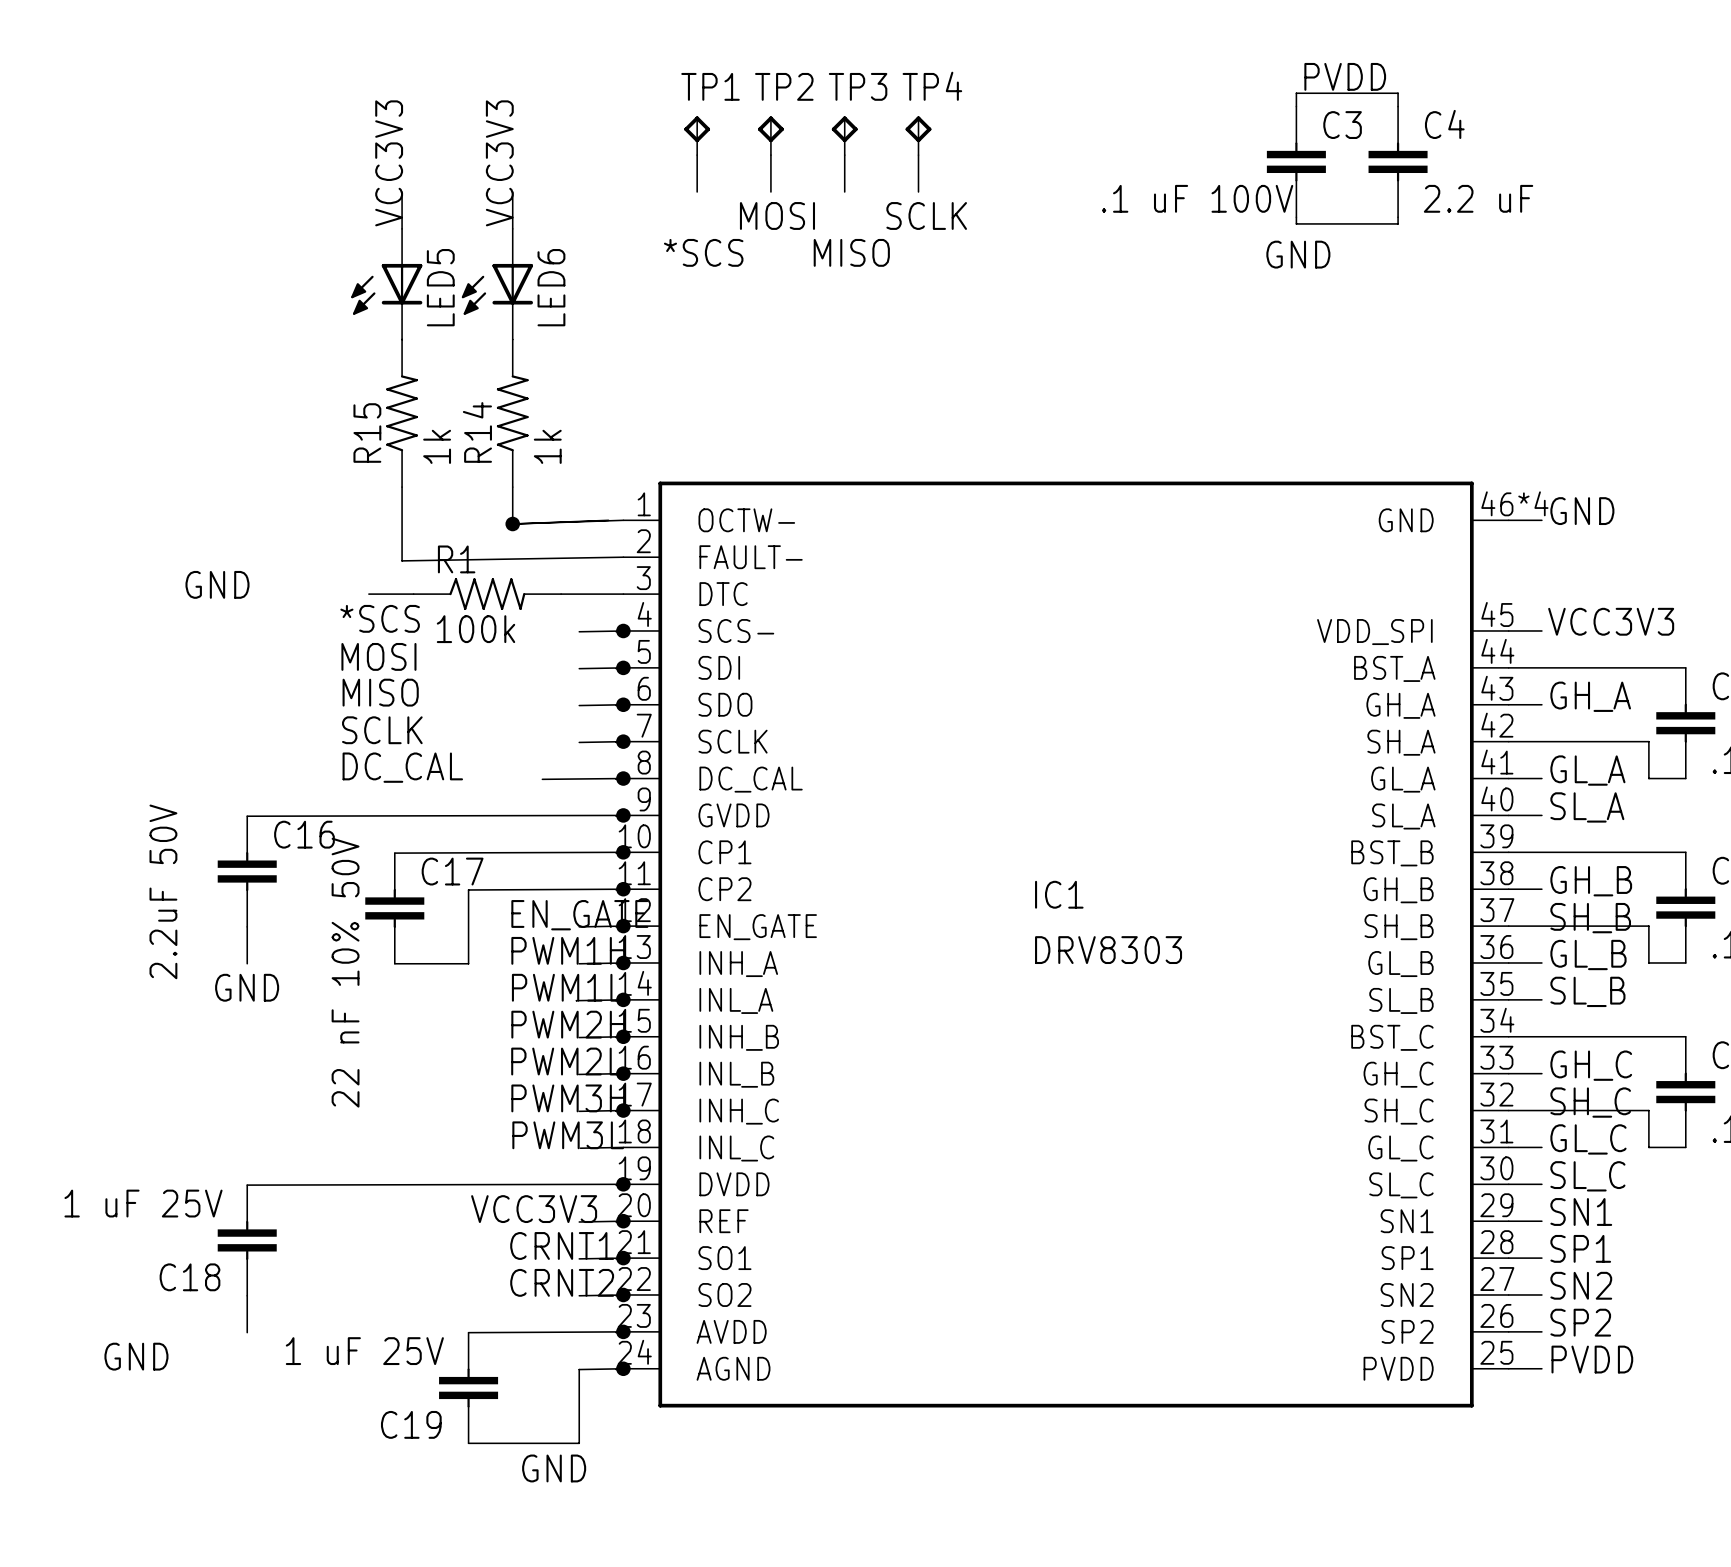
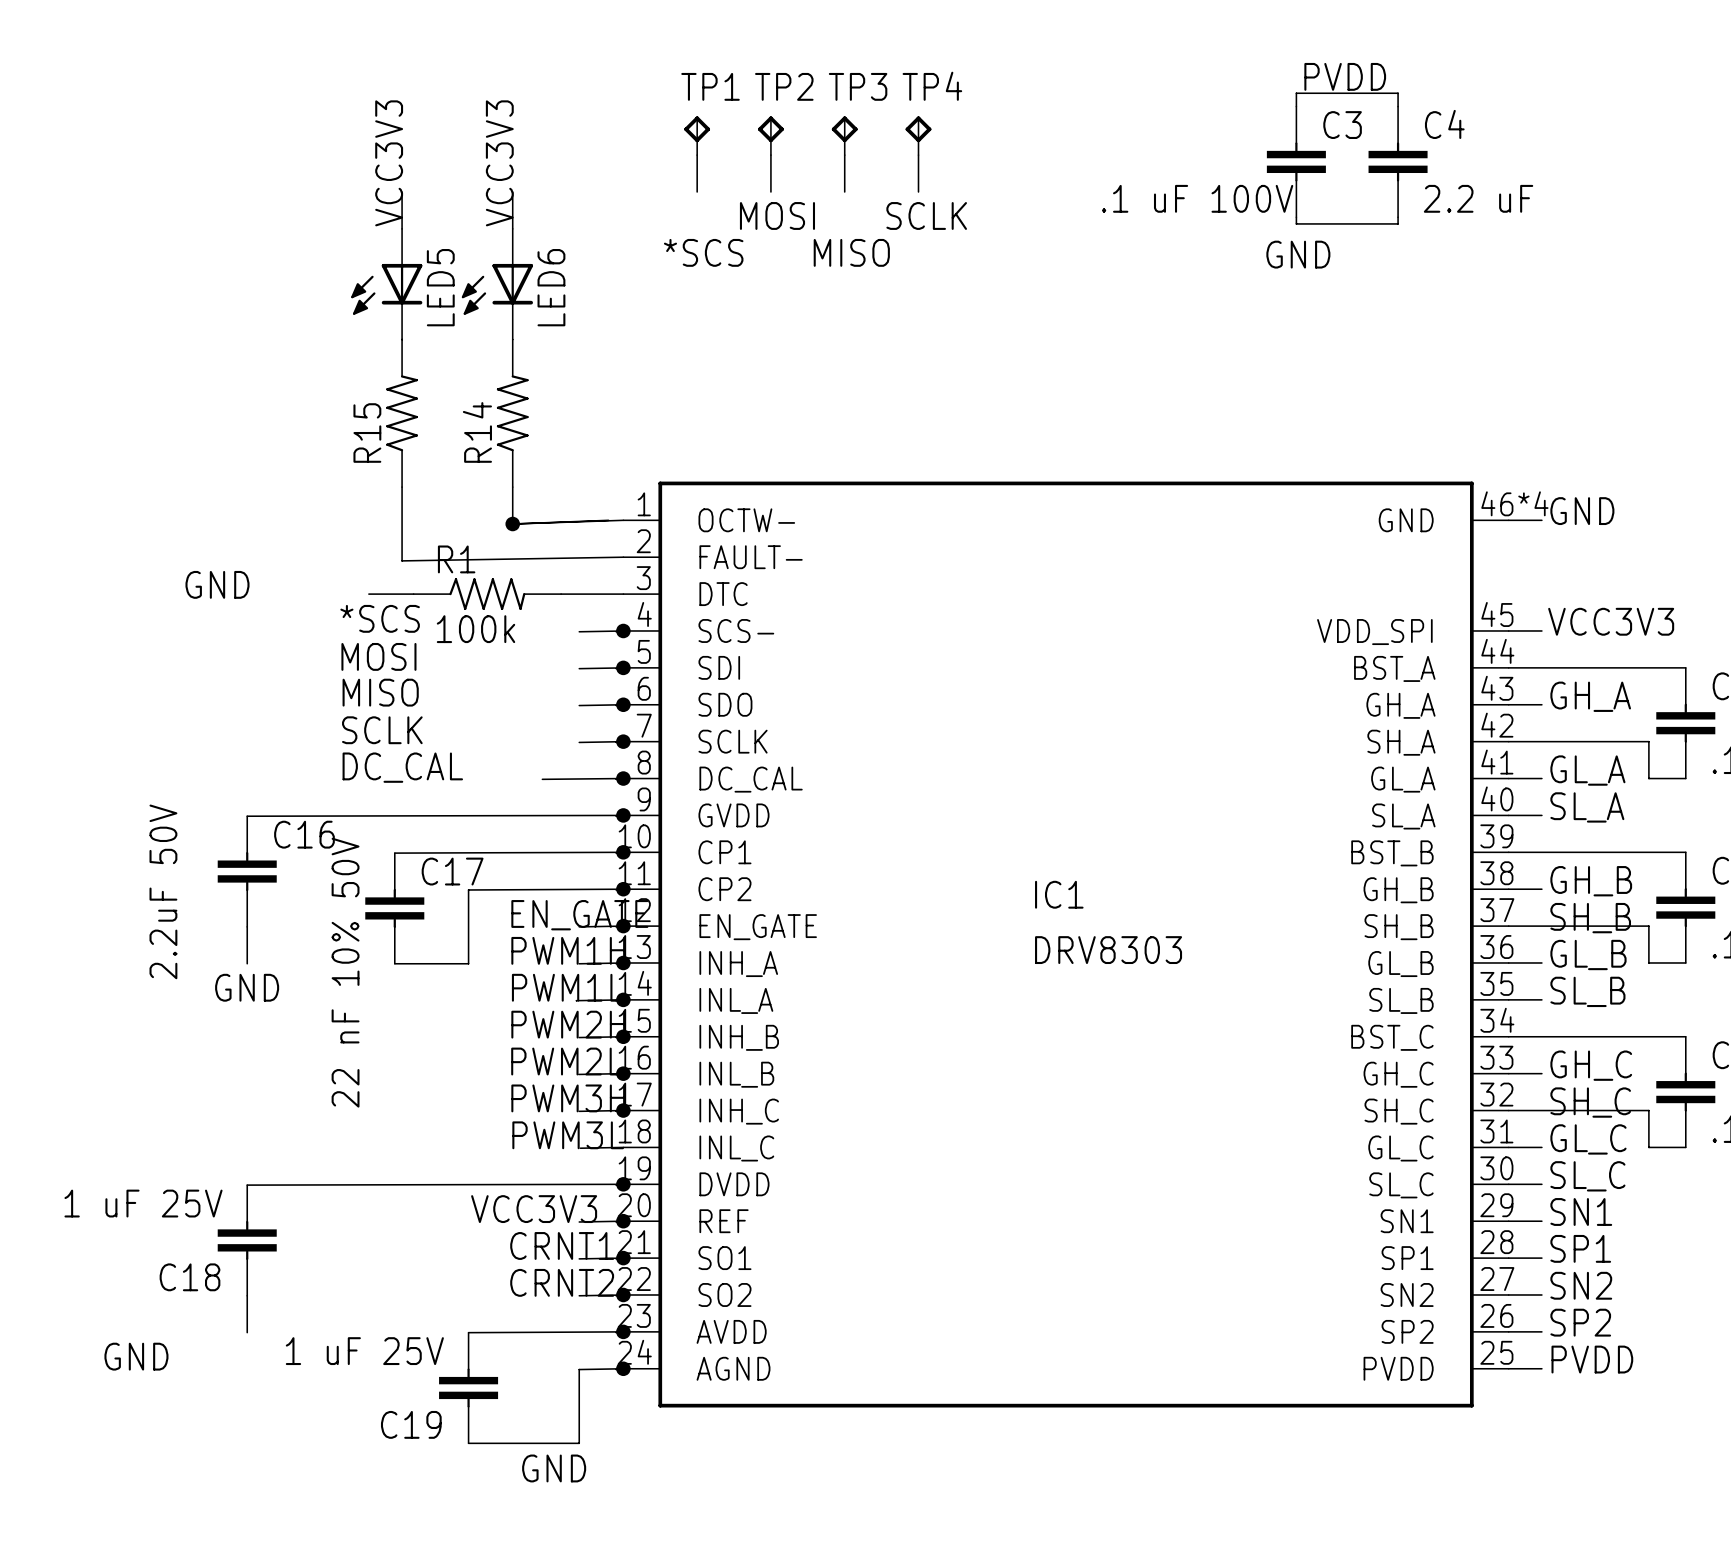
R15 value: 1k (437, 446) -> none
R14 value: 1k (547, 446) -> none

